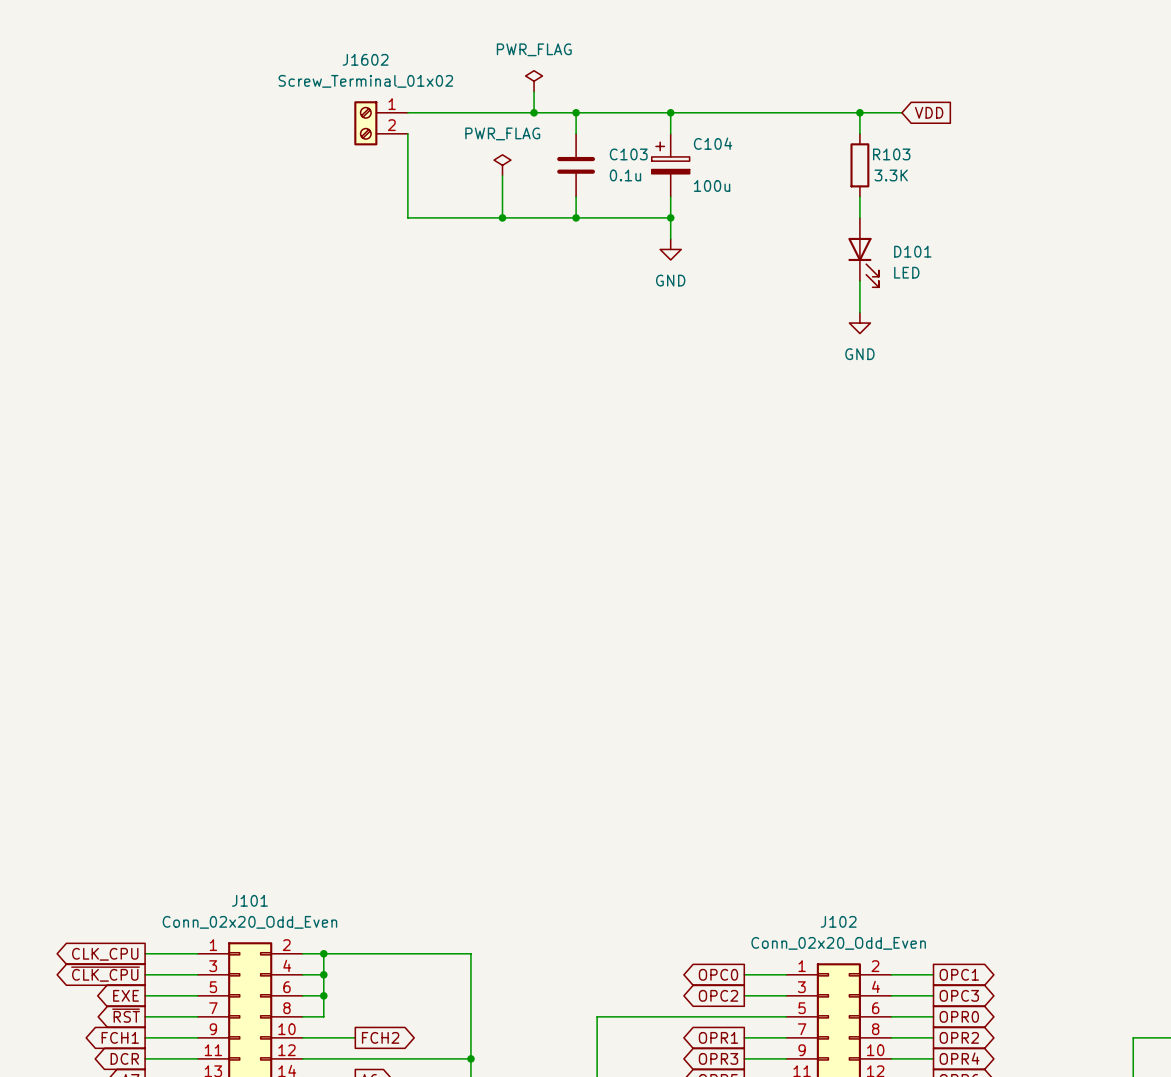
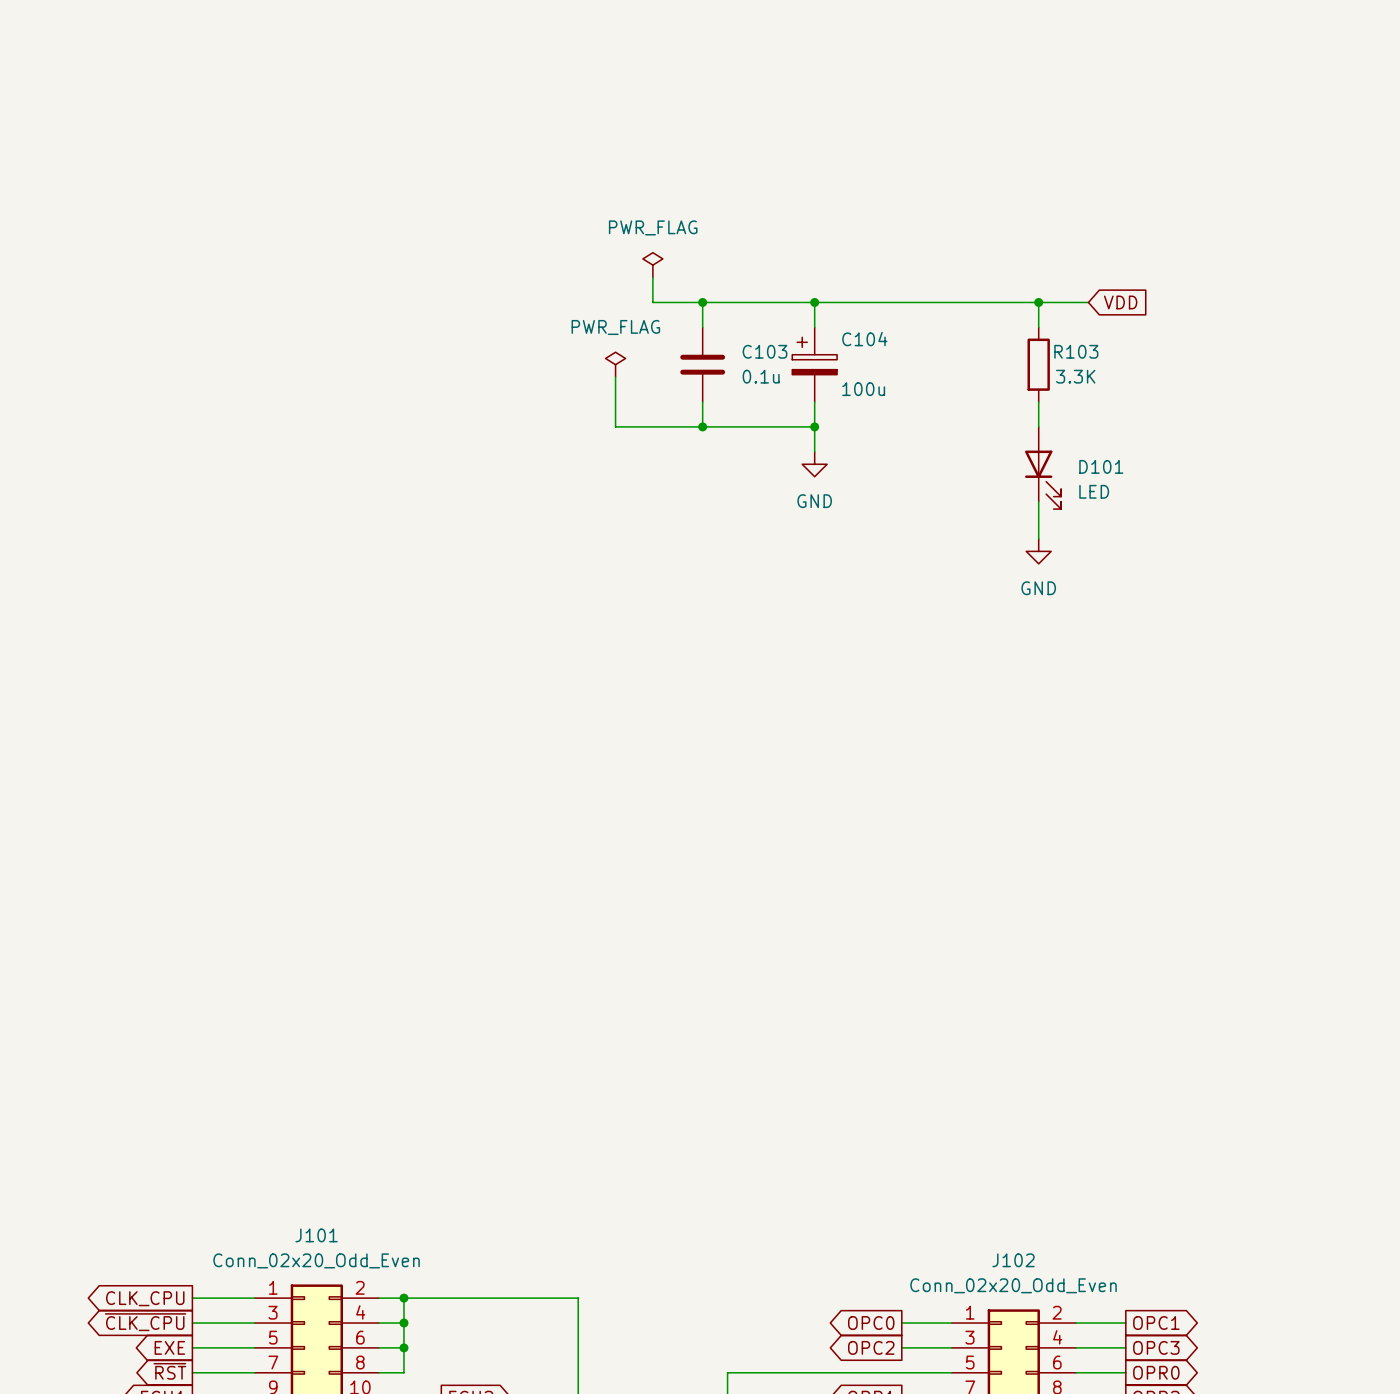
wire: (407, 112) (534, 112) -> none
junction: (534, 112) -> none
J1602: Screw_Terminal_01x02 (381, 123) -> none
wire: (407, 133) (407, 217) (502, 217) -> none
junction: (502, 217) -> none

